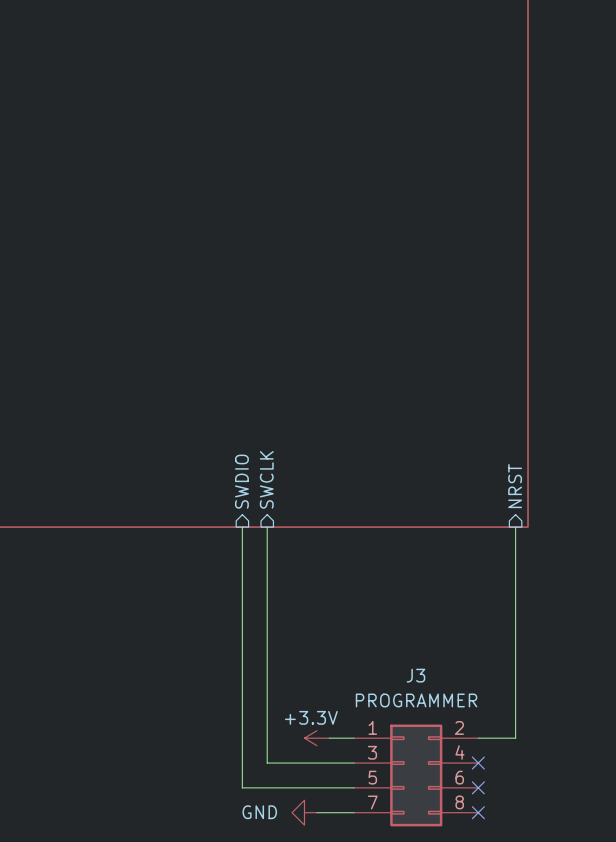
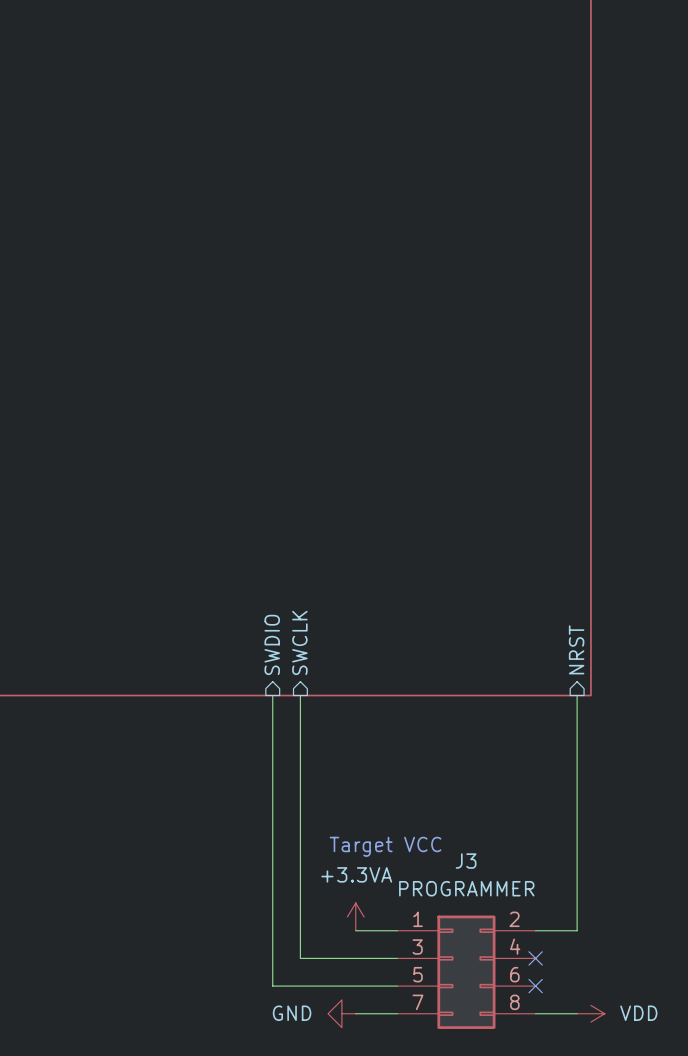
text: none -> Target VCC (385, 846)
power symbol: none -> +3.3VA (355, 916)
power symbol: +3.3V (316, 738) -> none
wire: none -> (535, 1013) (577, 1013)
no-connect mark: (478, 812) -> none
power symbol: none -> VDD (590, 1013)

